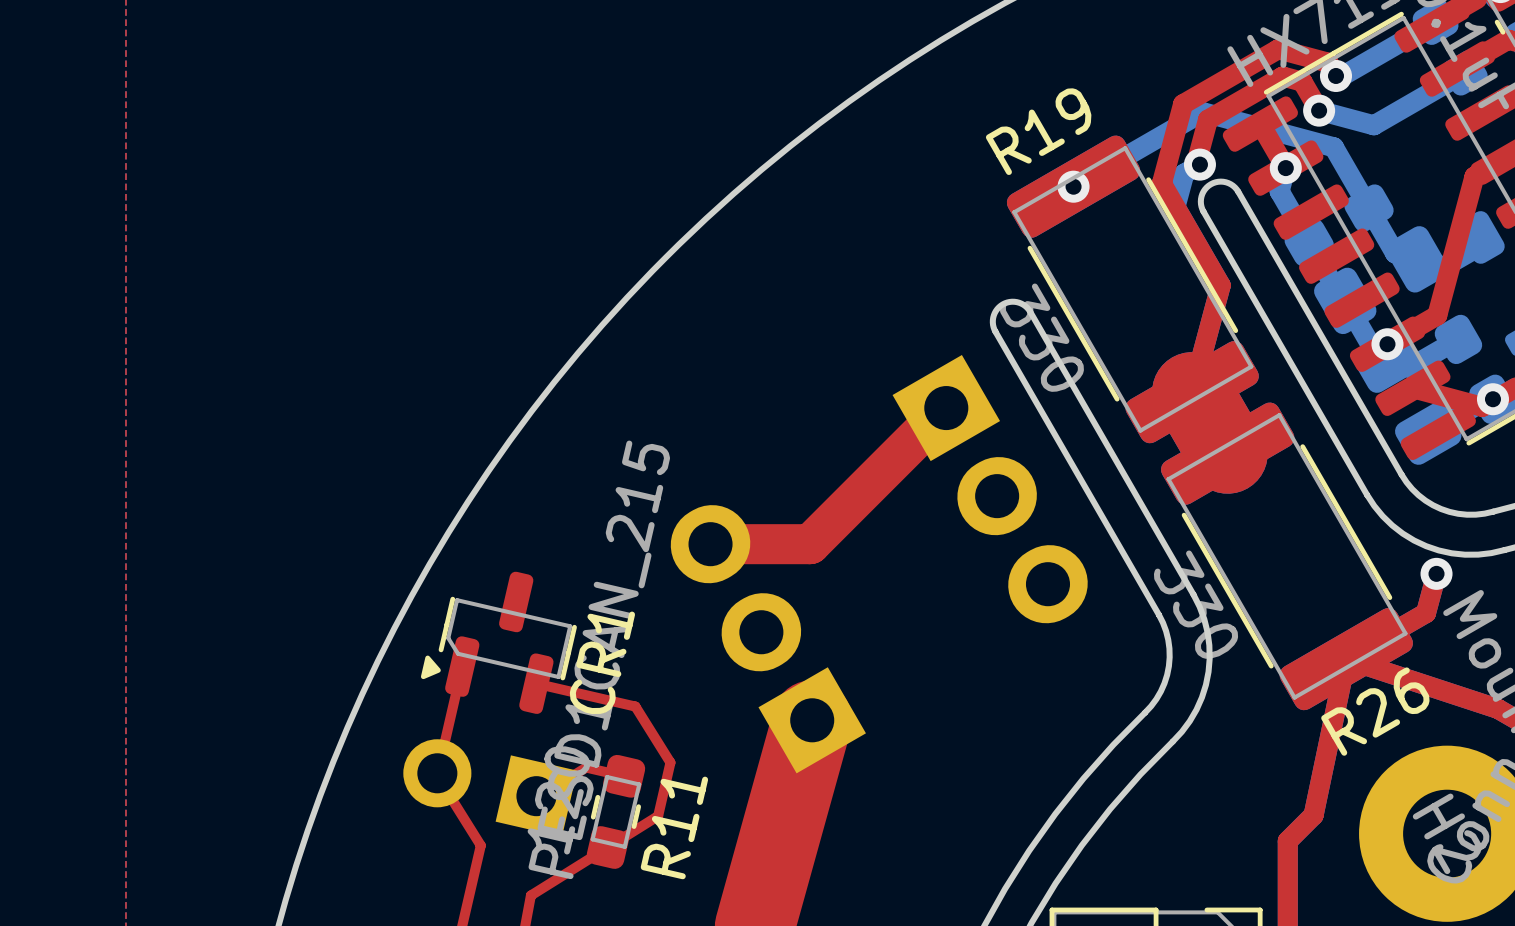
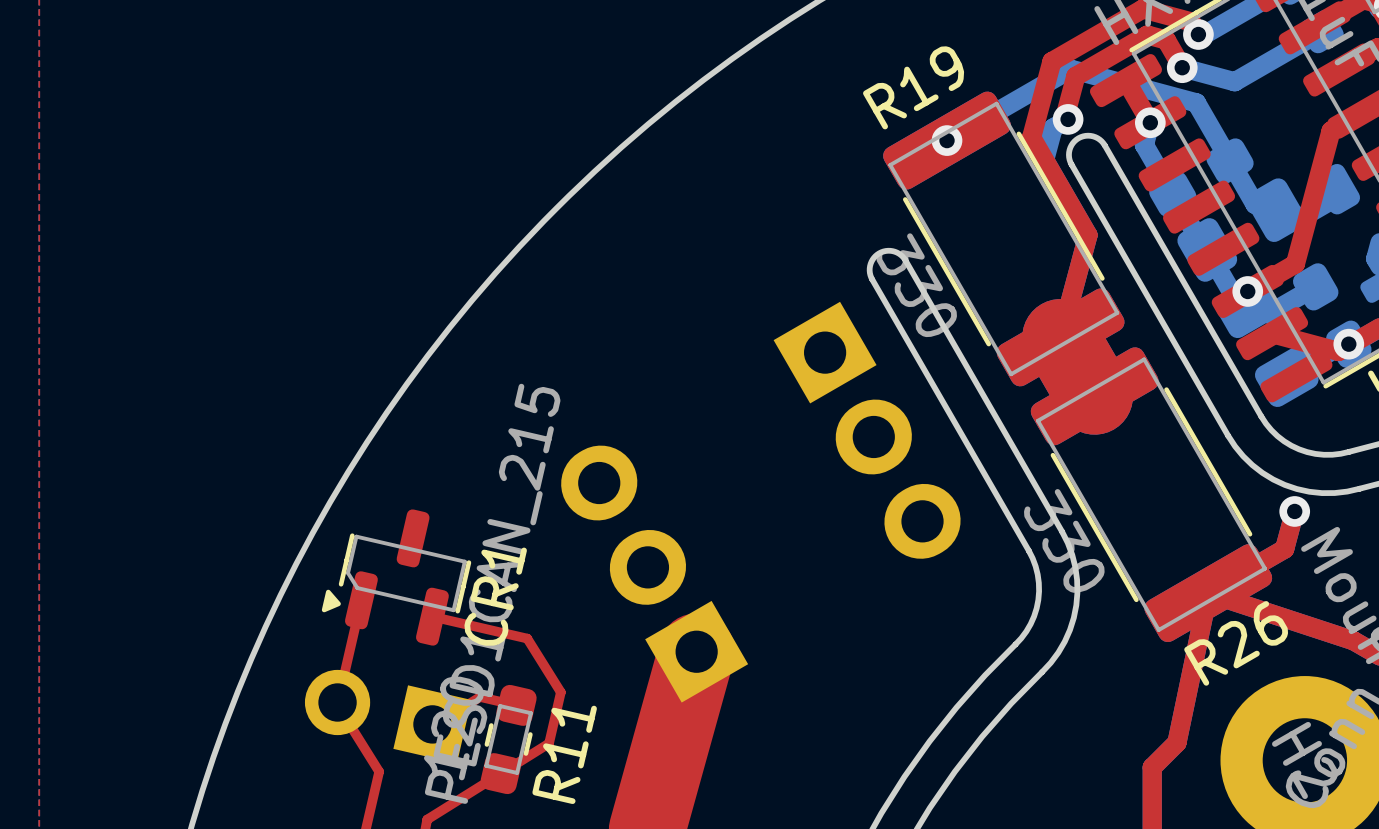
top track: (946, 408) (810, 544) (710, 544) -> none

